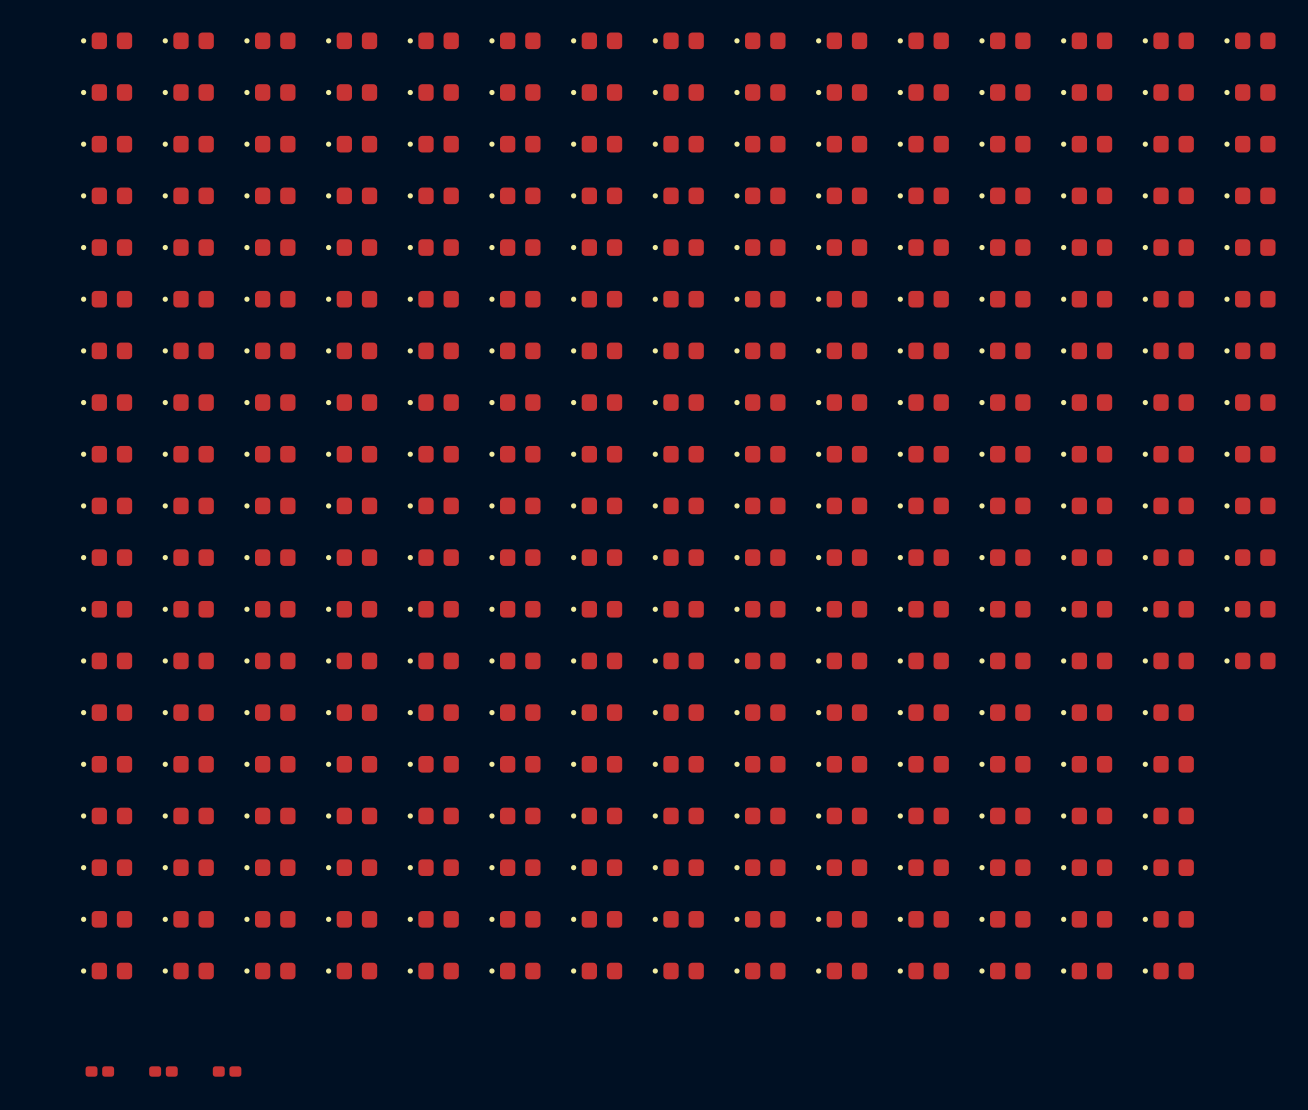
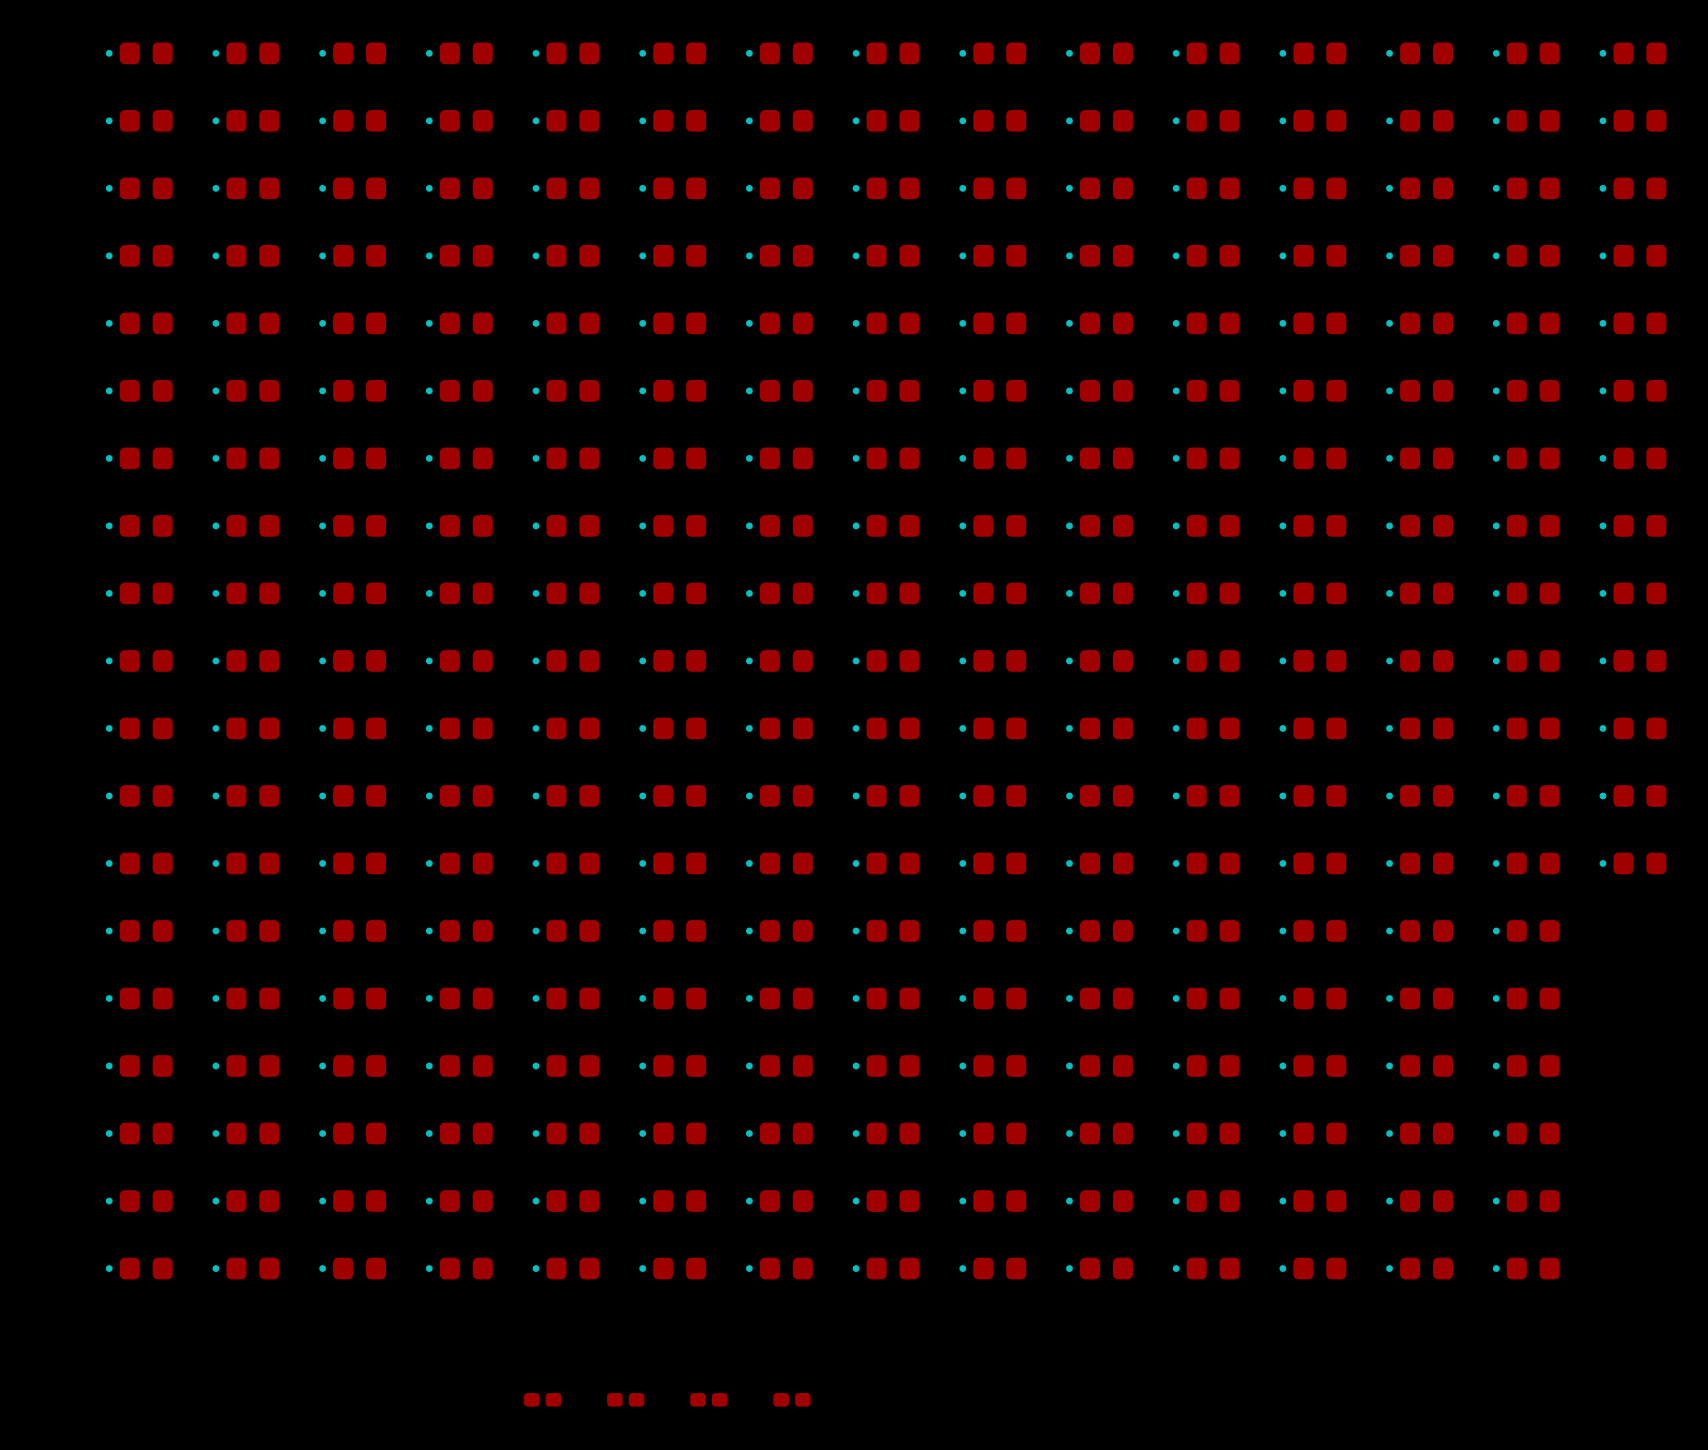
part: (99, 1071) -> none
part: (163, 1071) -> none
part: (227, 1071) -> none
part: none -> (542, 1399)
part: none -> (625, 1399)
part: none -> (708, 1399)
part: none -> (791, 1399)

